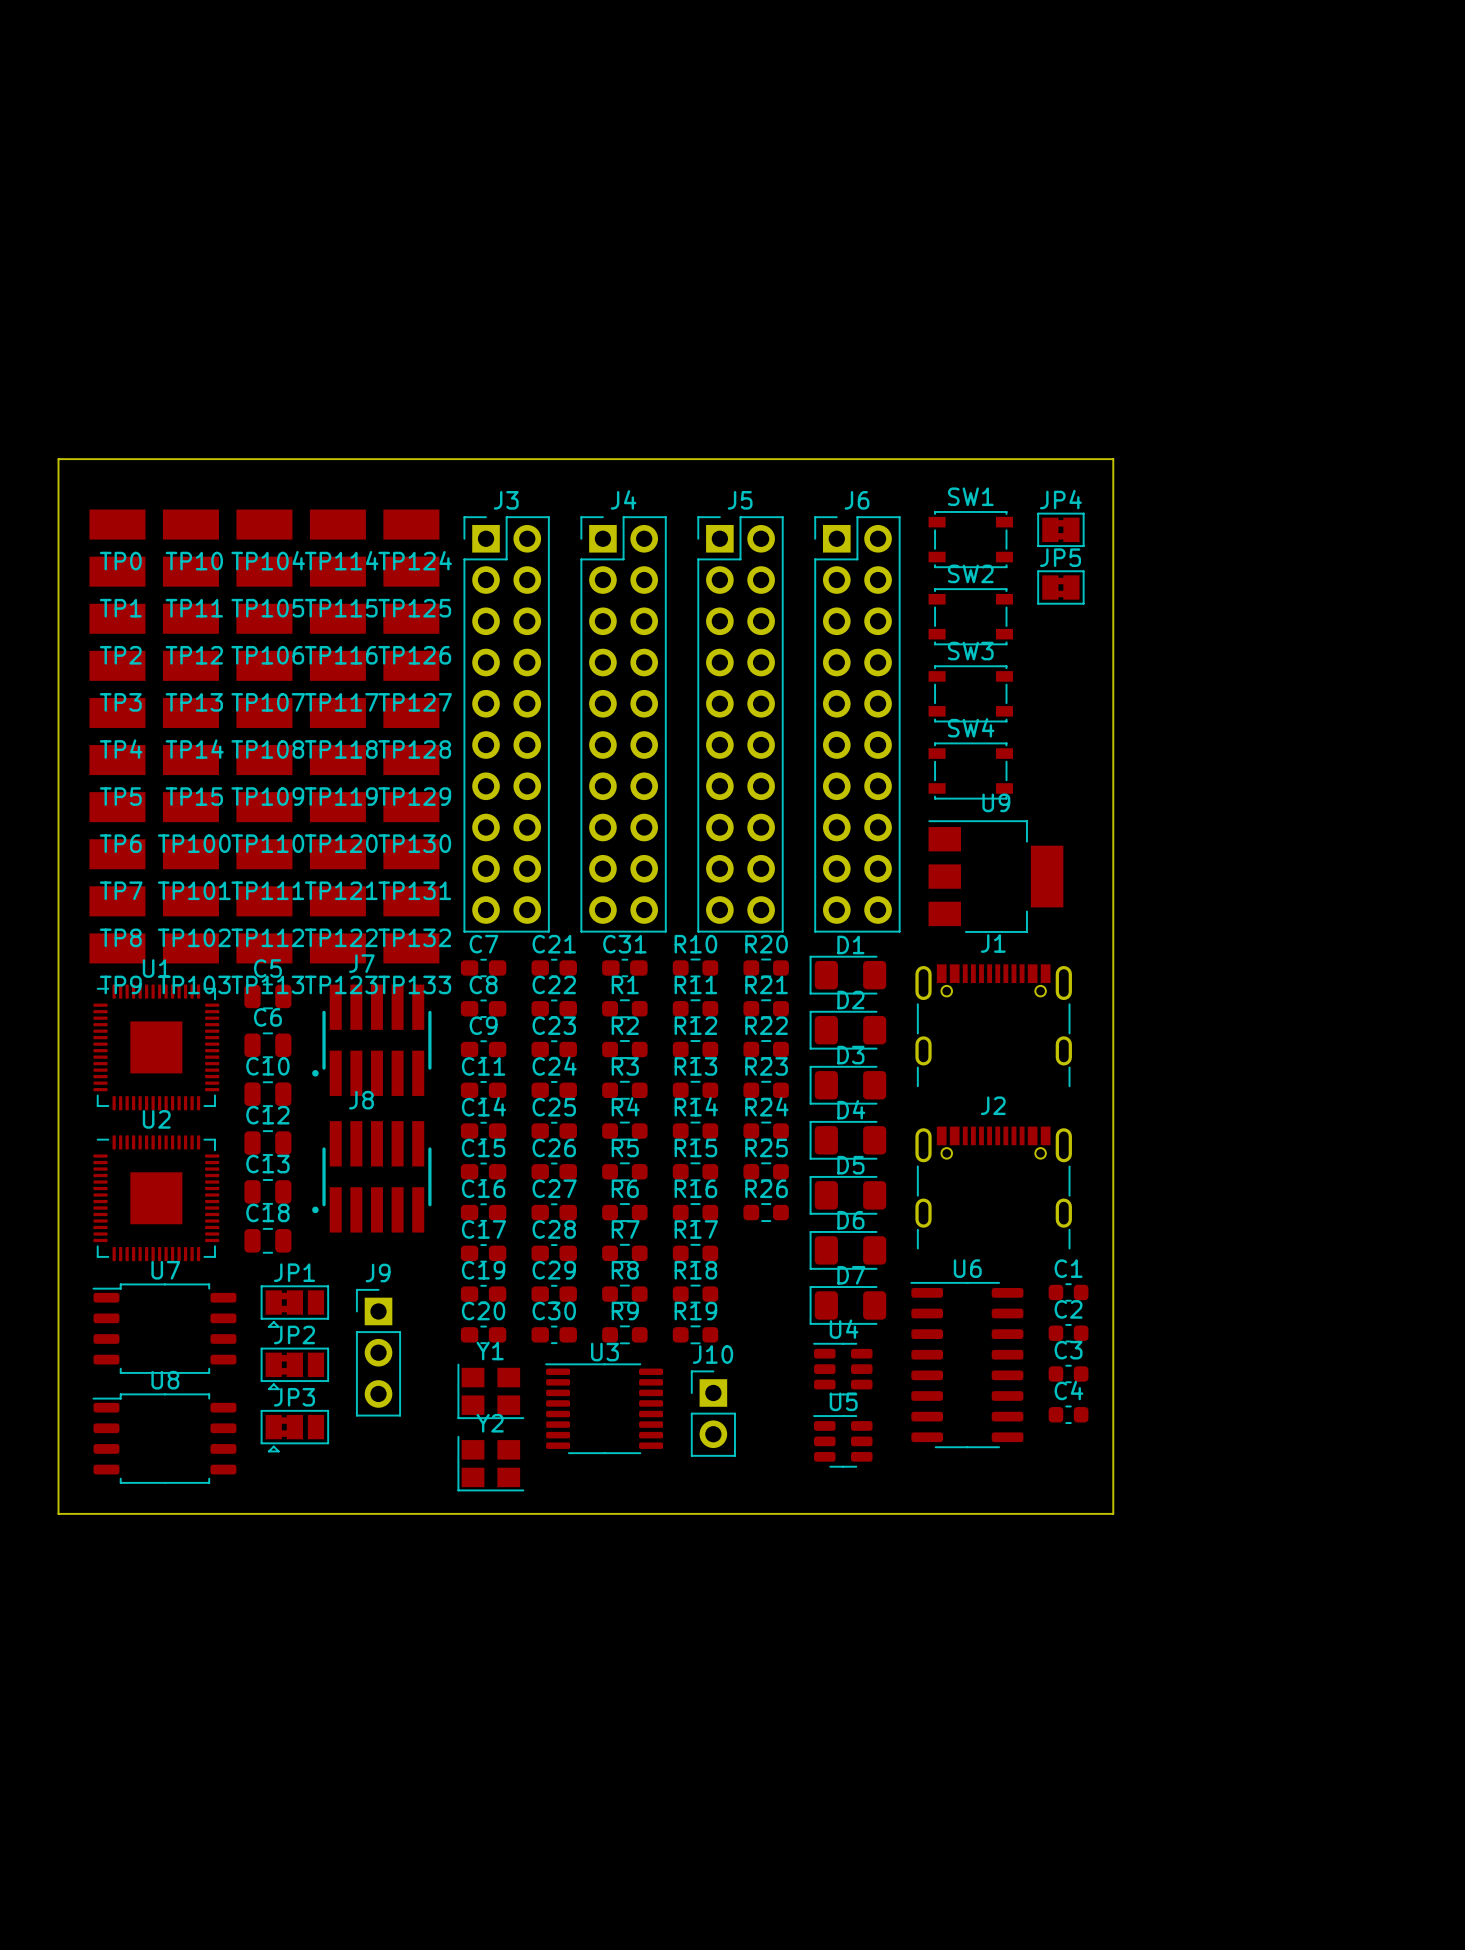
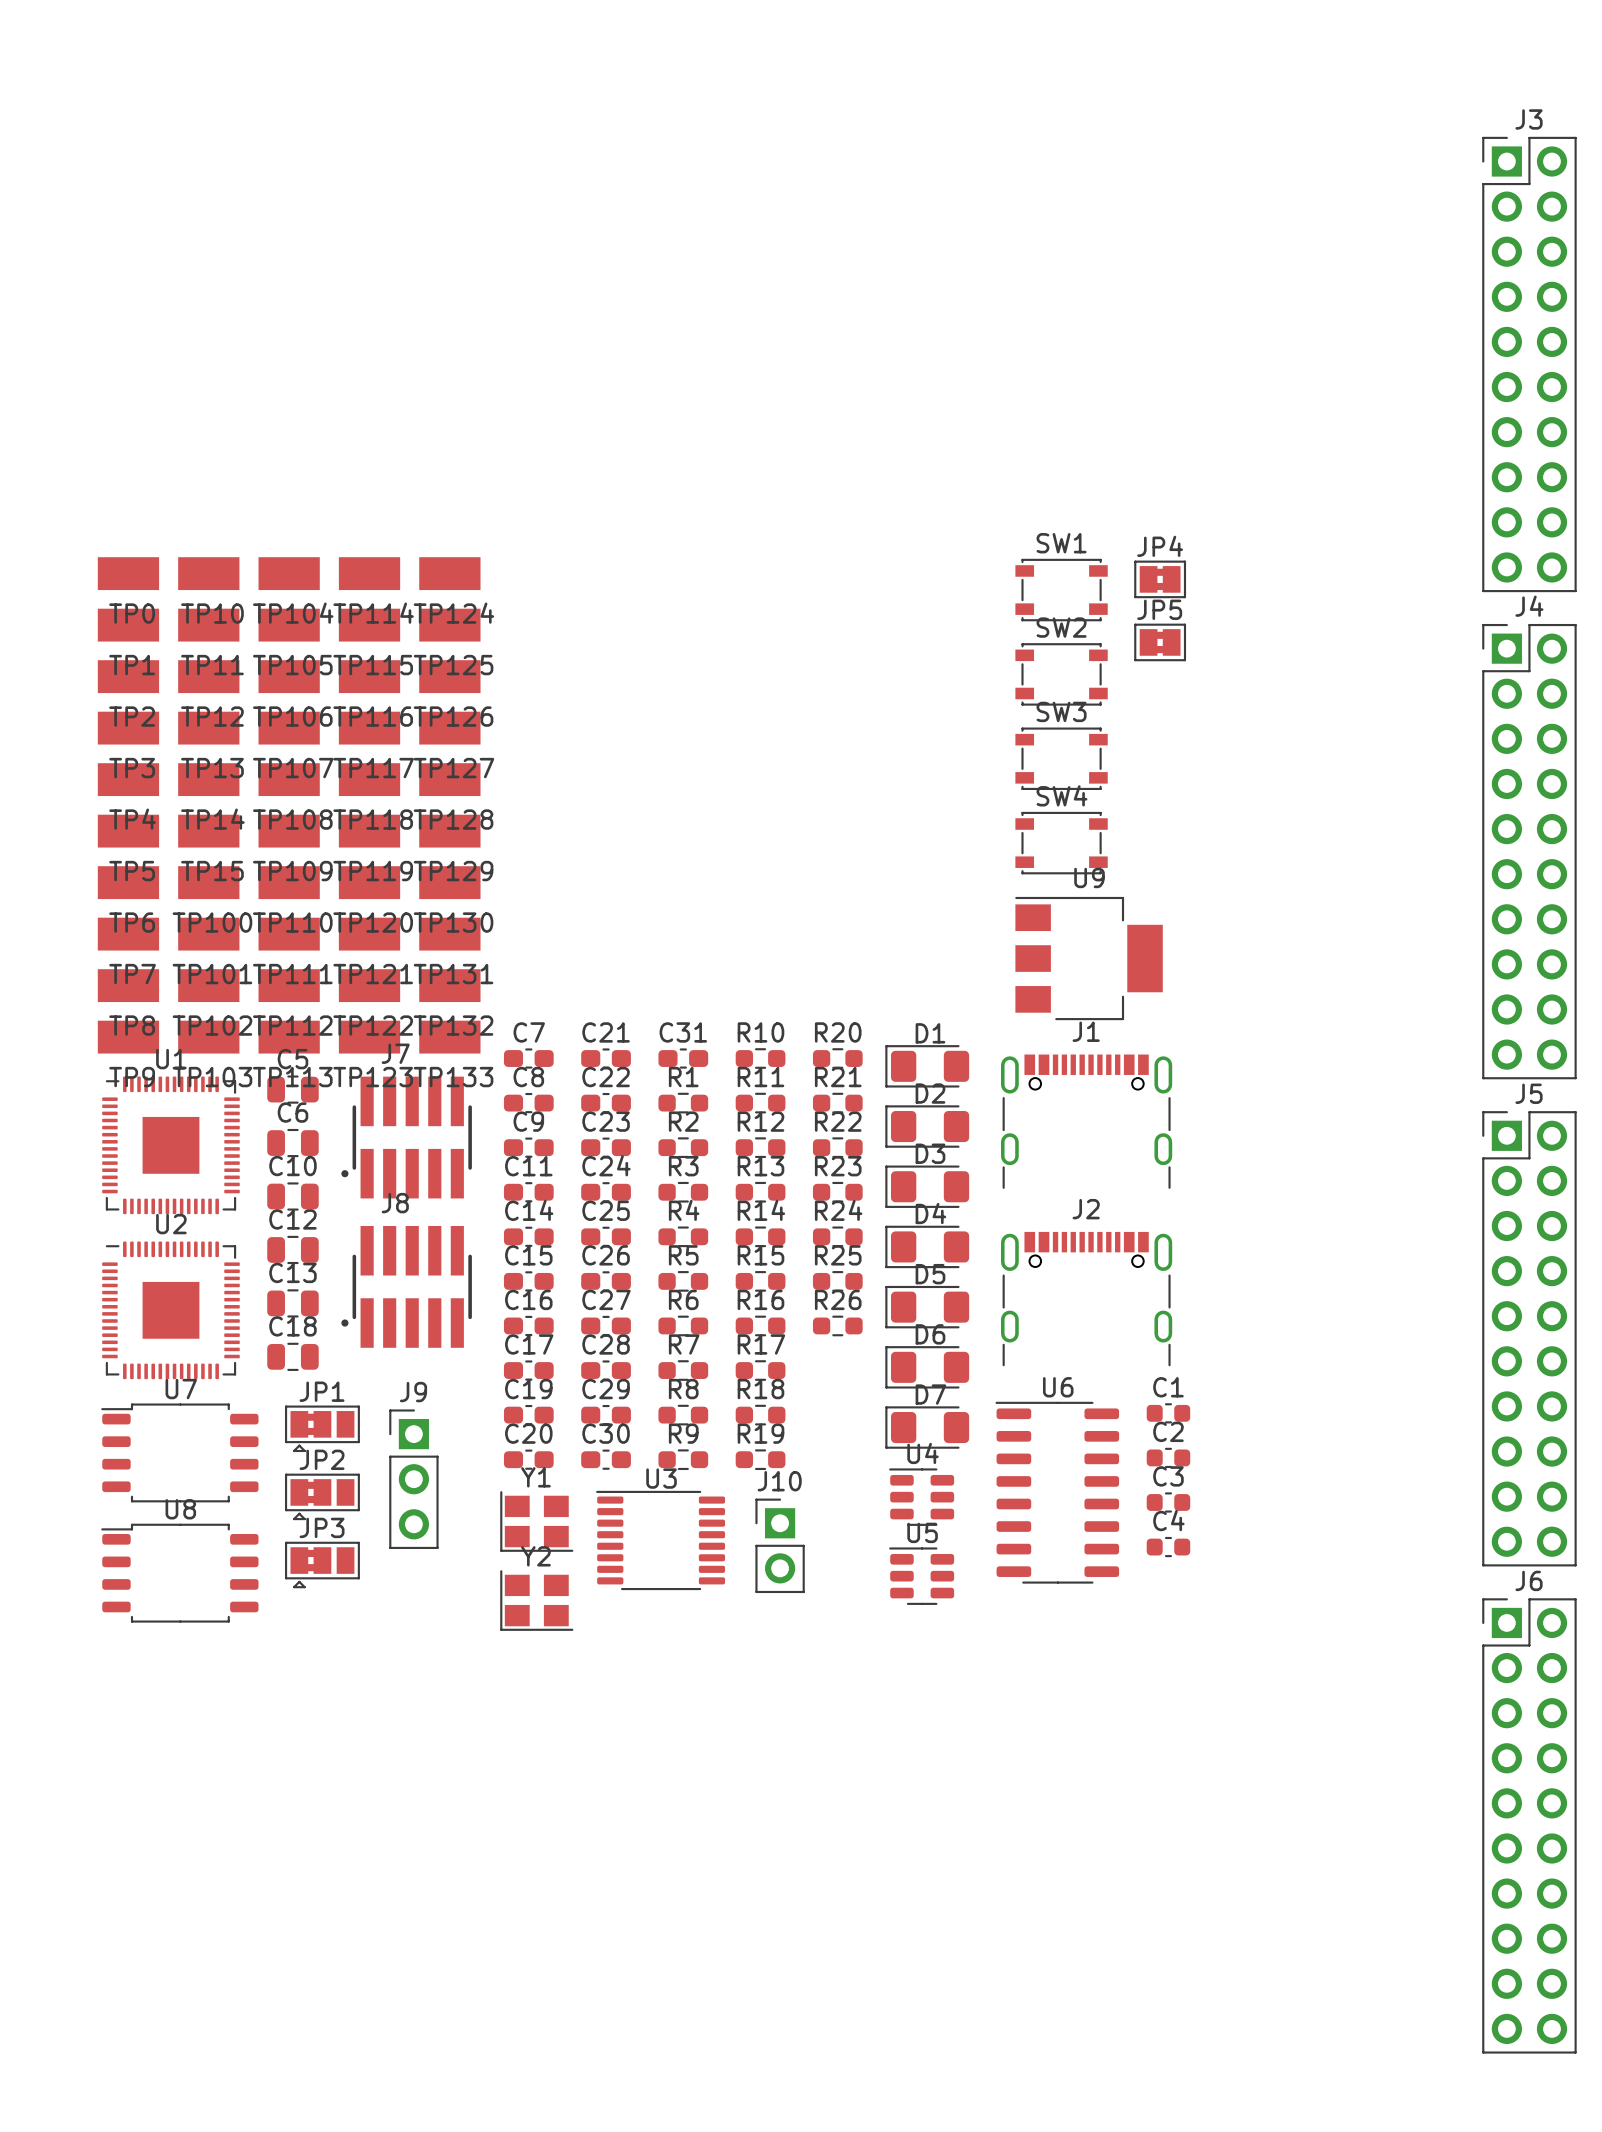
board edge: (58, 459) (1113, 459) (1113, 1513) (58, 1513) (58, 459) -> none
J3 position: (506, 724) -> (1529, 364)
J4 position: (623, 724) -> (1529, 851)
J5 position: (740, 724) -> (1529, 1338)
J6 position: (857, 724) -> (1529, 1825)

